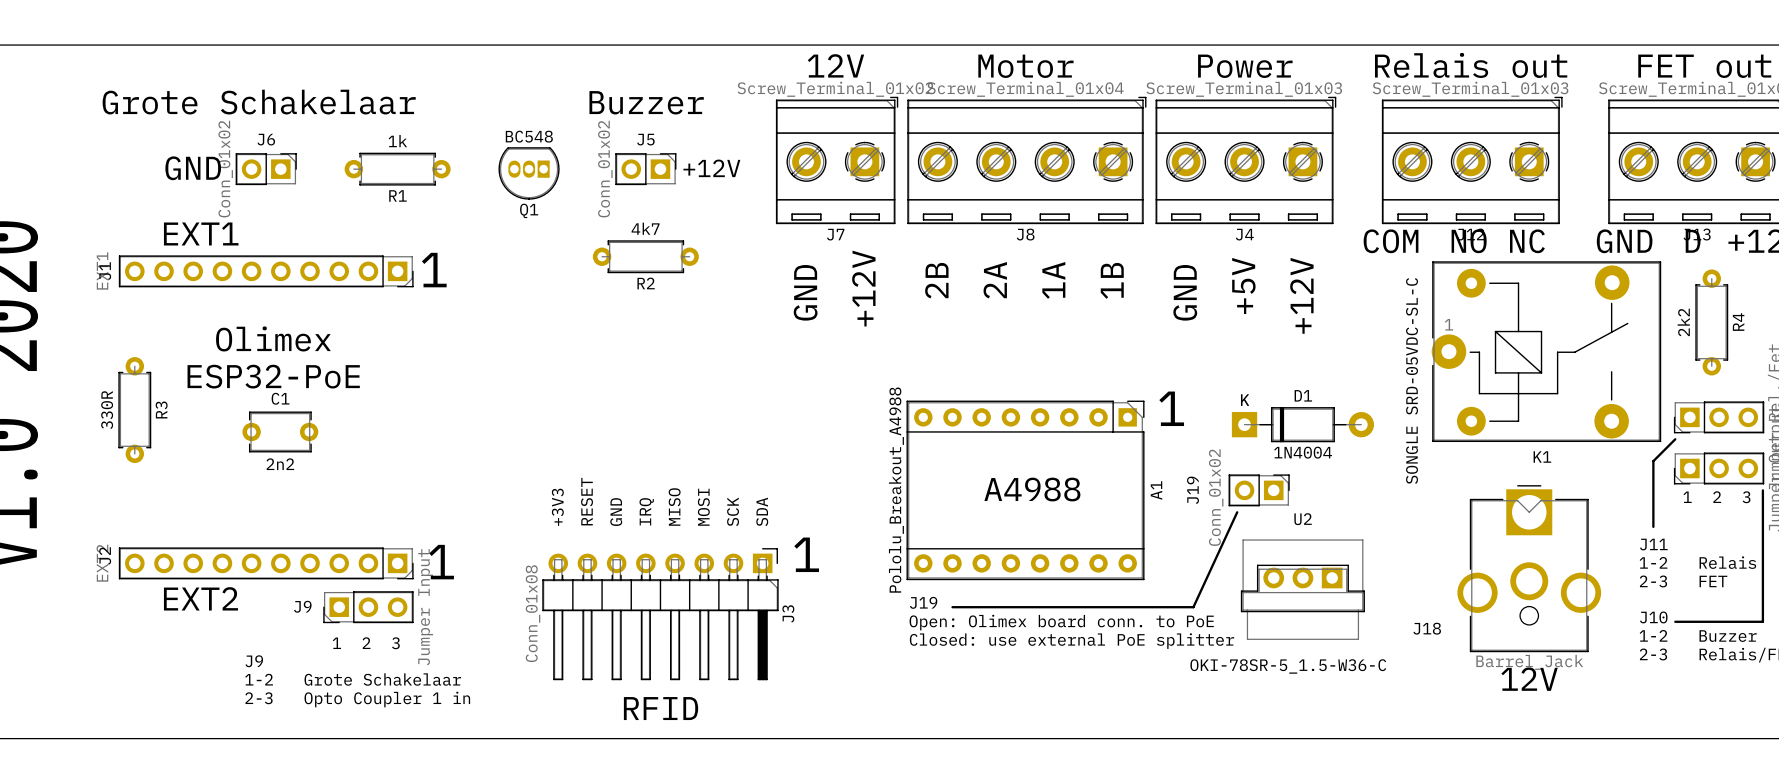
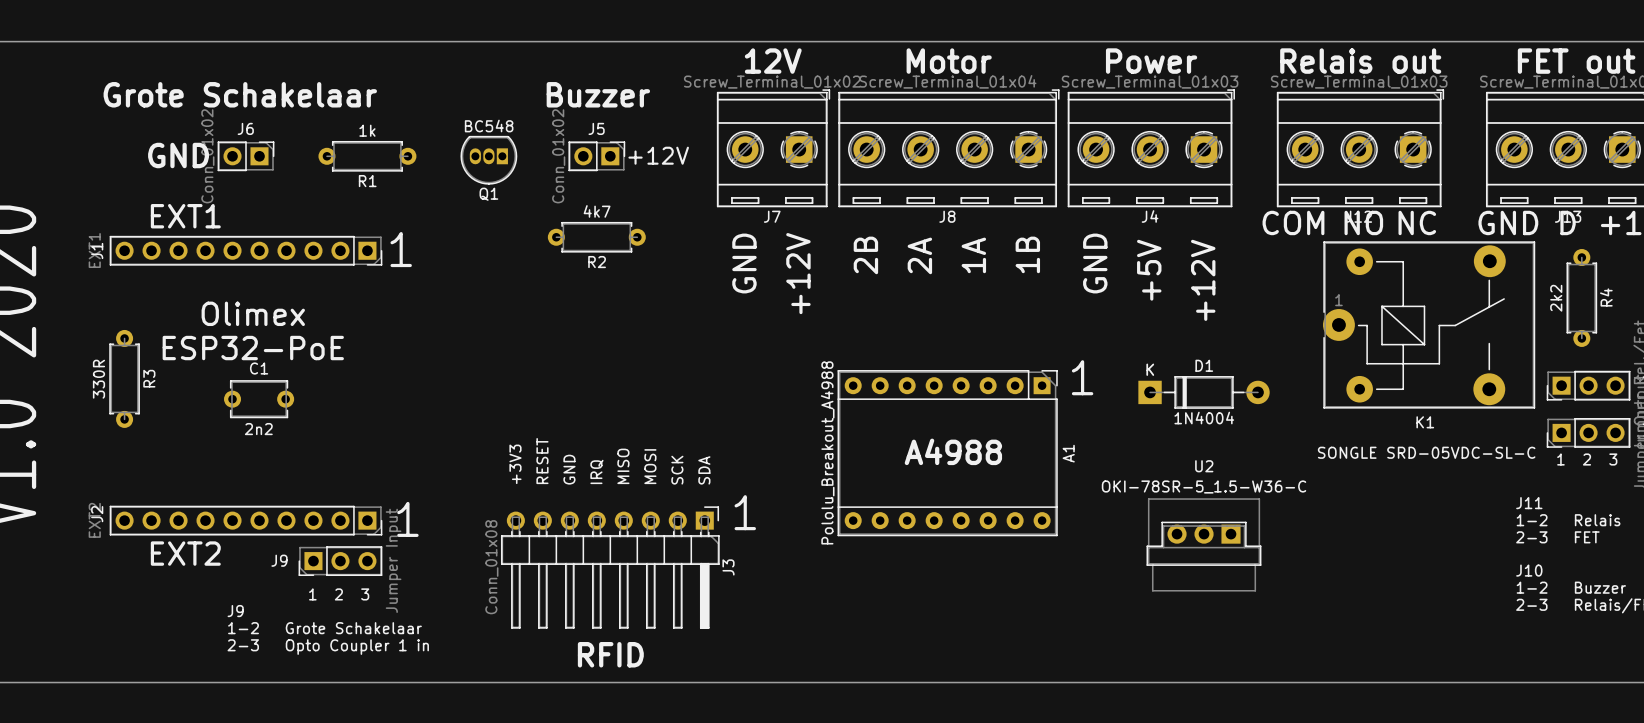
K1 value rotation: 0° (1412, 381) -> 90° clockwise (1426, 452)
line: (1675, 439) (1653, 461) (1653, 526) -> none
J19: Conn_01x02 (1259, 490) -> none
line: (1762, 490) (1762, 621) (1675, 621) -> none
line: (1237, 512) (1193, 607) (952, 607) -> none
U2 name position: U2 (1303, 519) -> U2 (1204, 466)
J18: Barrel_Jack (1529, 568) -> none
text: J19 (923, 602) -> none
text: Open: Olimex board conn. to PoE (1061, 622) -> none
text: Closed: use external PoE splitter (1072, 641) -> none
U2 value position: OKI-78SR-5_1.5-W36-C (1288, 666) -> OKI-78SR-5_1.5-W36-C (1204, 486)
text: 12V (1529, 679) -> none

